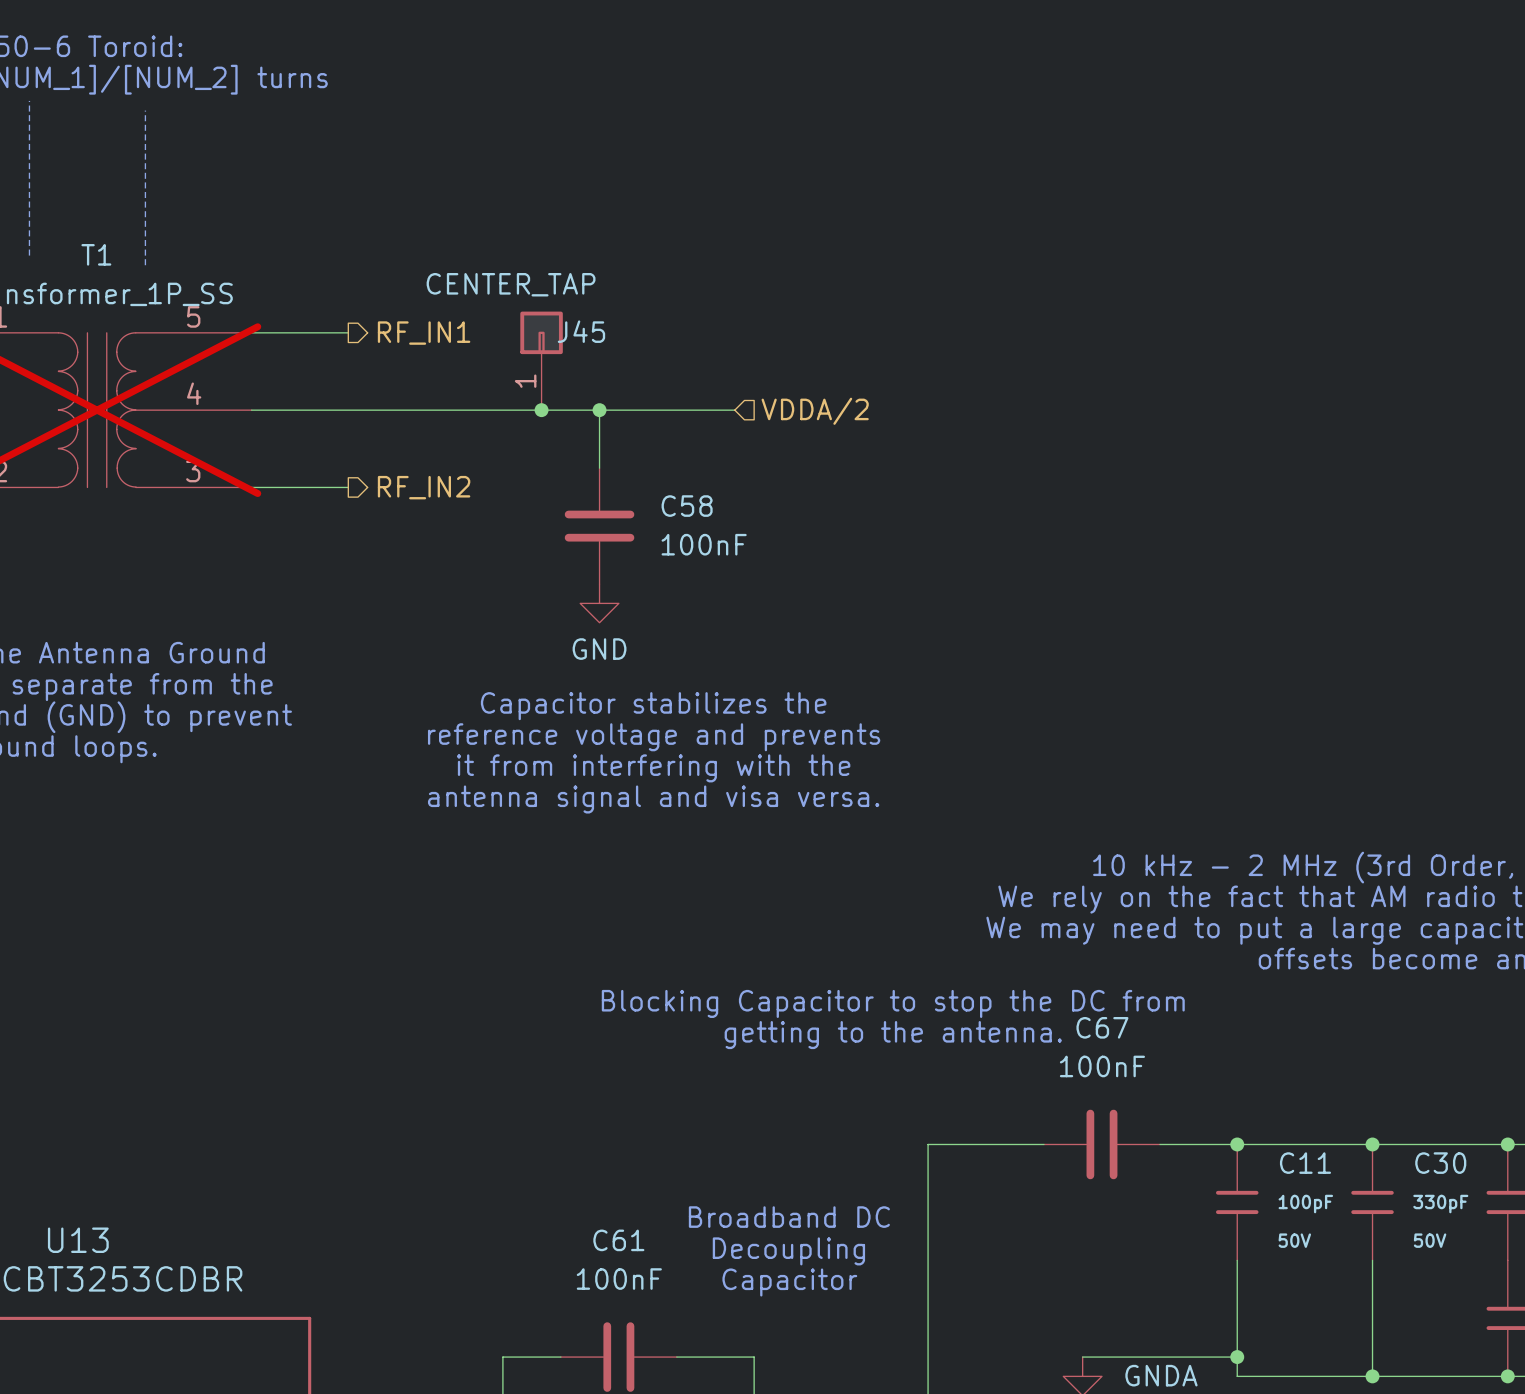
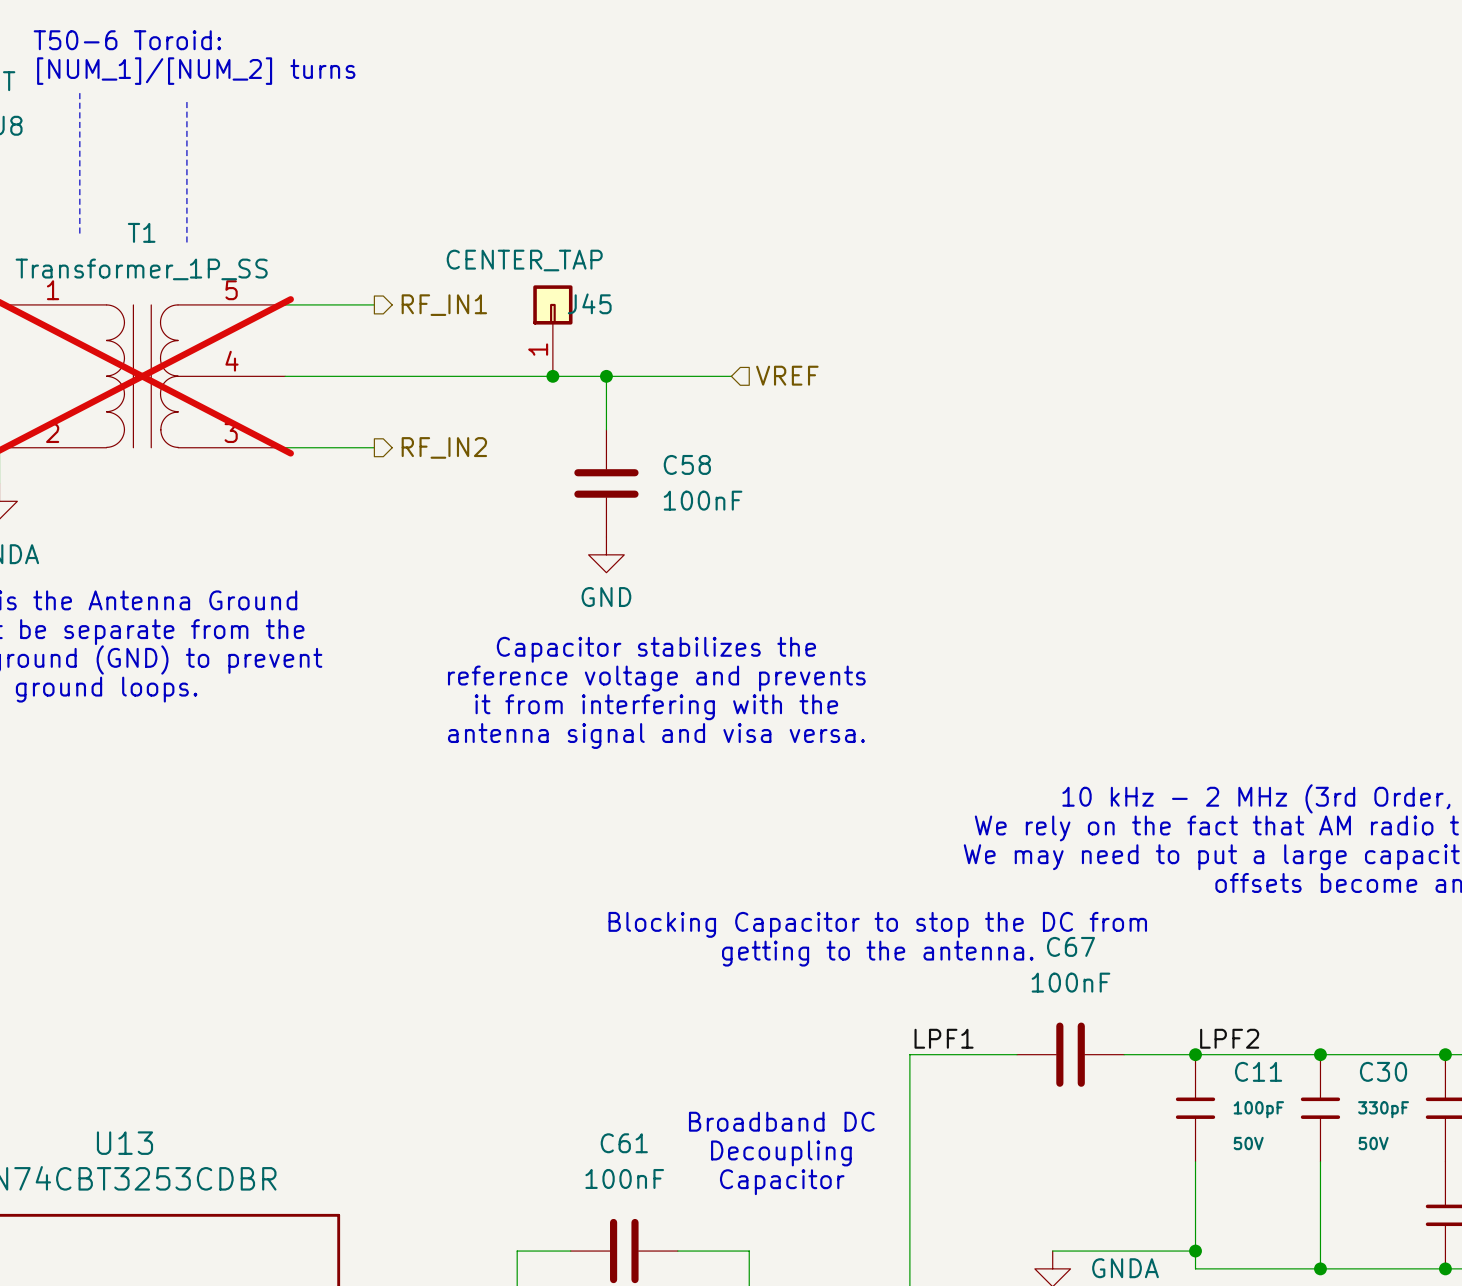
hierarchical label: VDDA/2 (815, 411) -> VREF (787, 375)
label: none -> LPF1 (944, 1038)
label: none -> LPF2 (1229, 1038)

